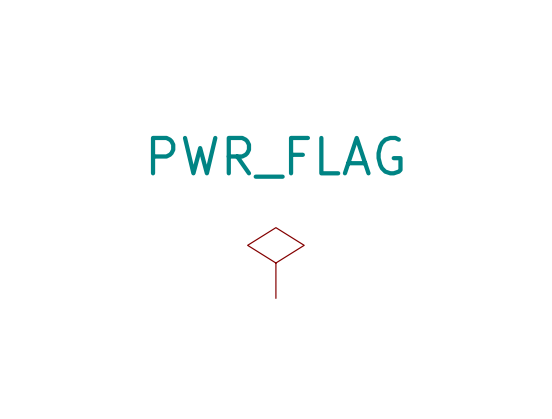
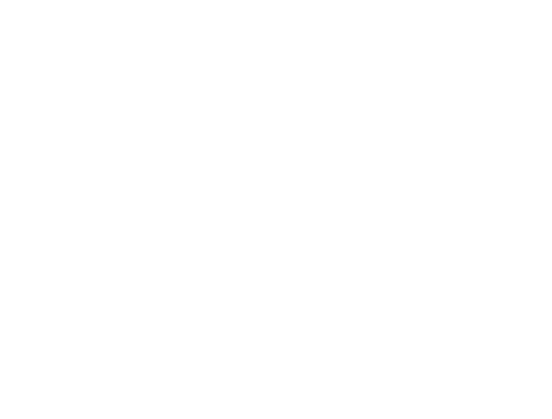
power symbol: PWR_FLAG (275, 263) -> none

